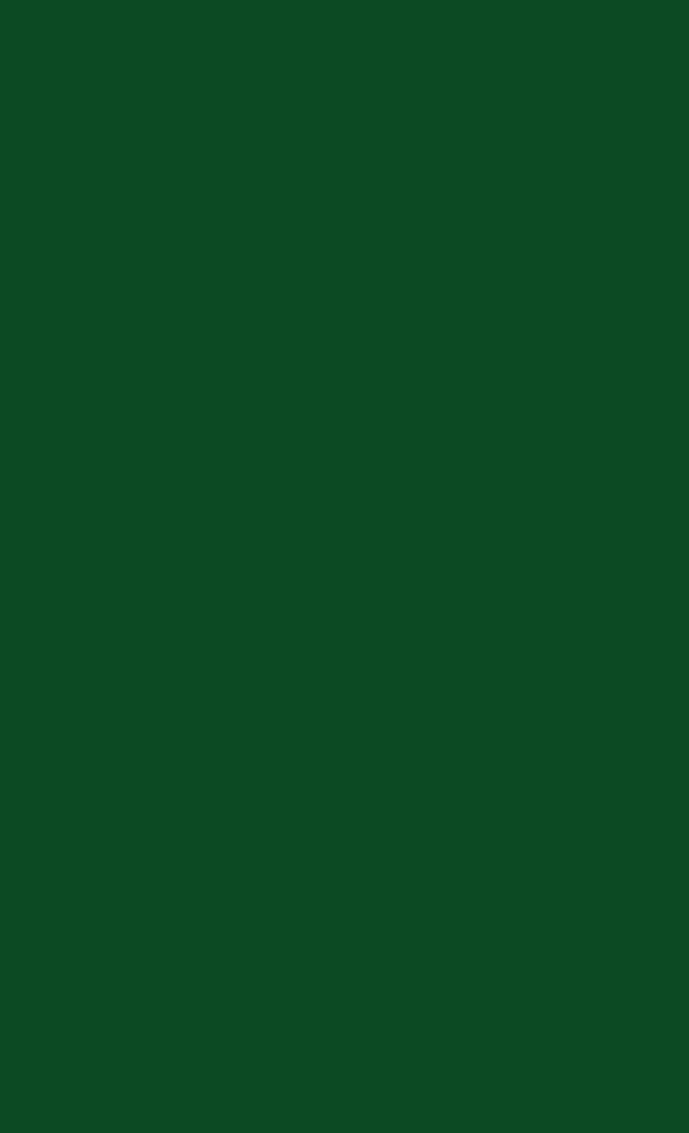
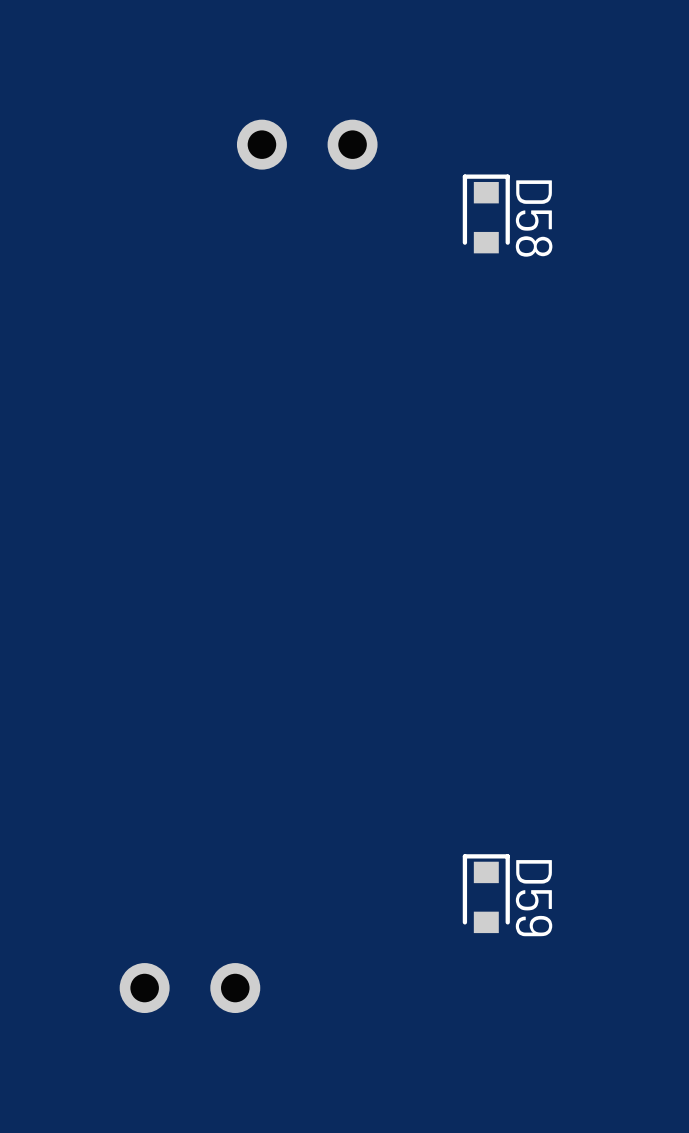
part: none -> (307, 144)
D58: none -> (486, 213)
D59: none -> (486, 893)
part: none -> (189, 988)

